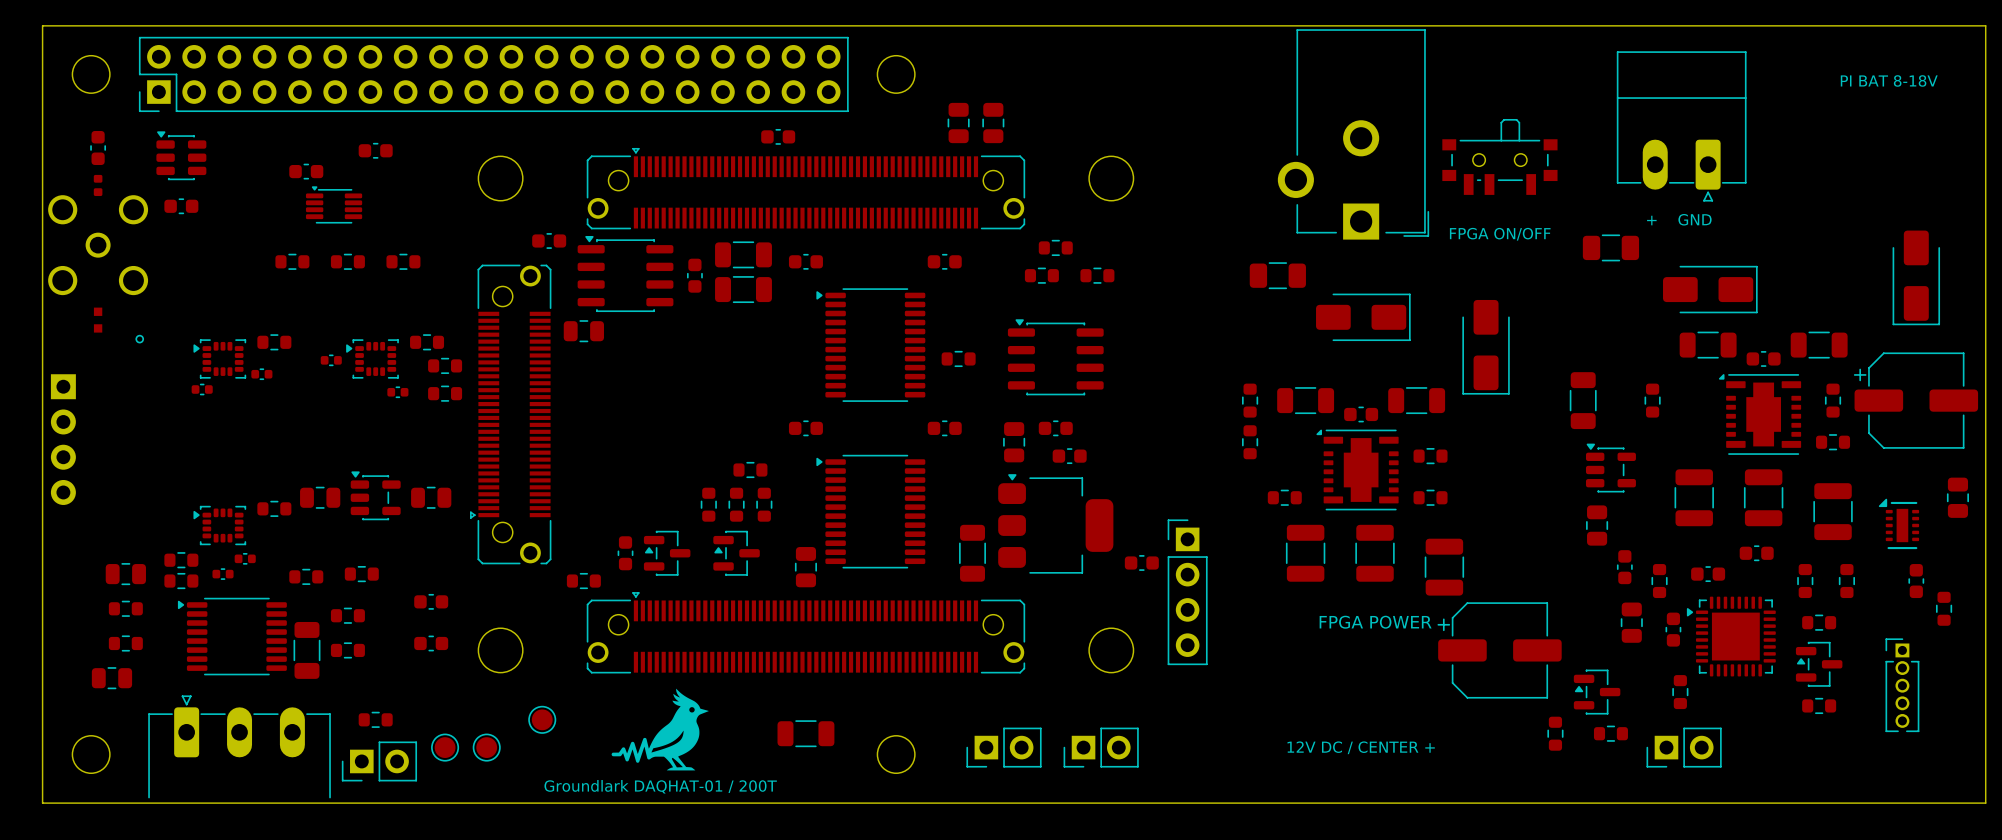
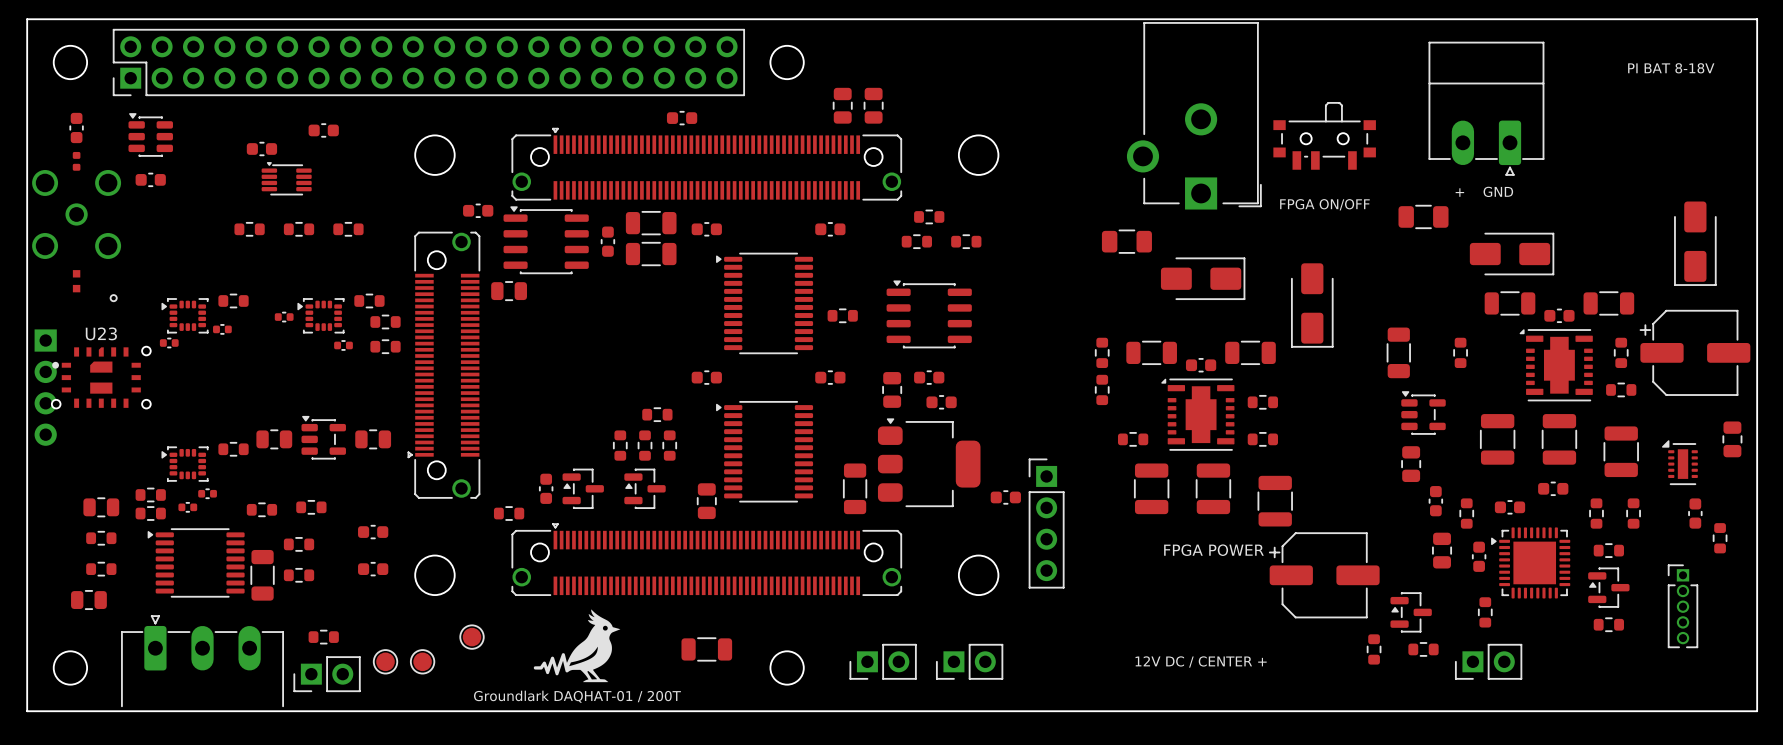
U23: none -> (101, 377)

